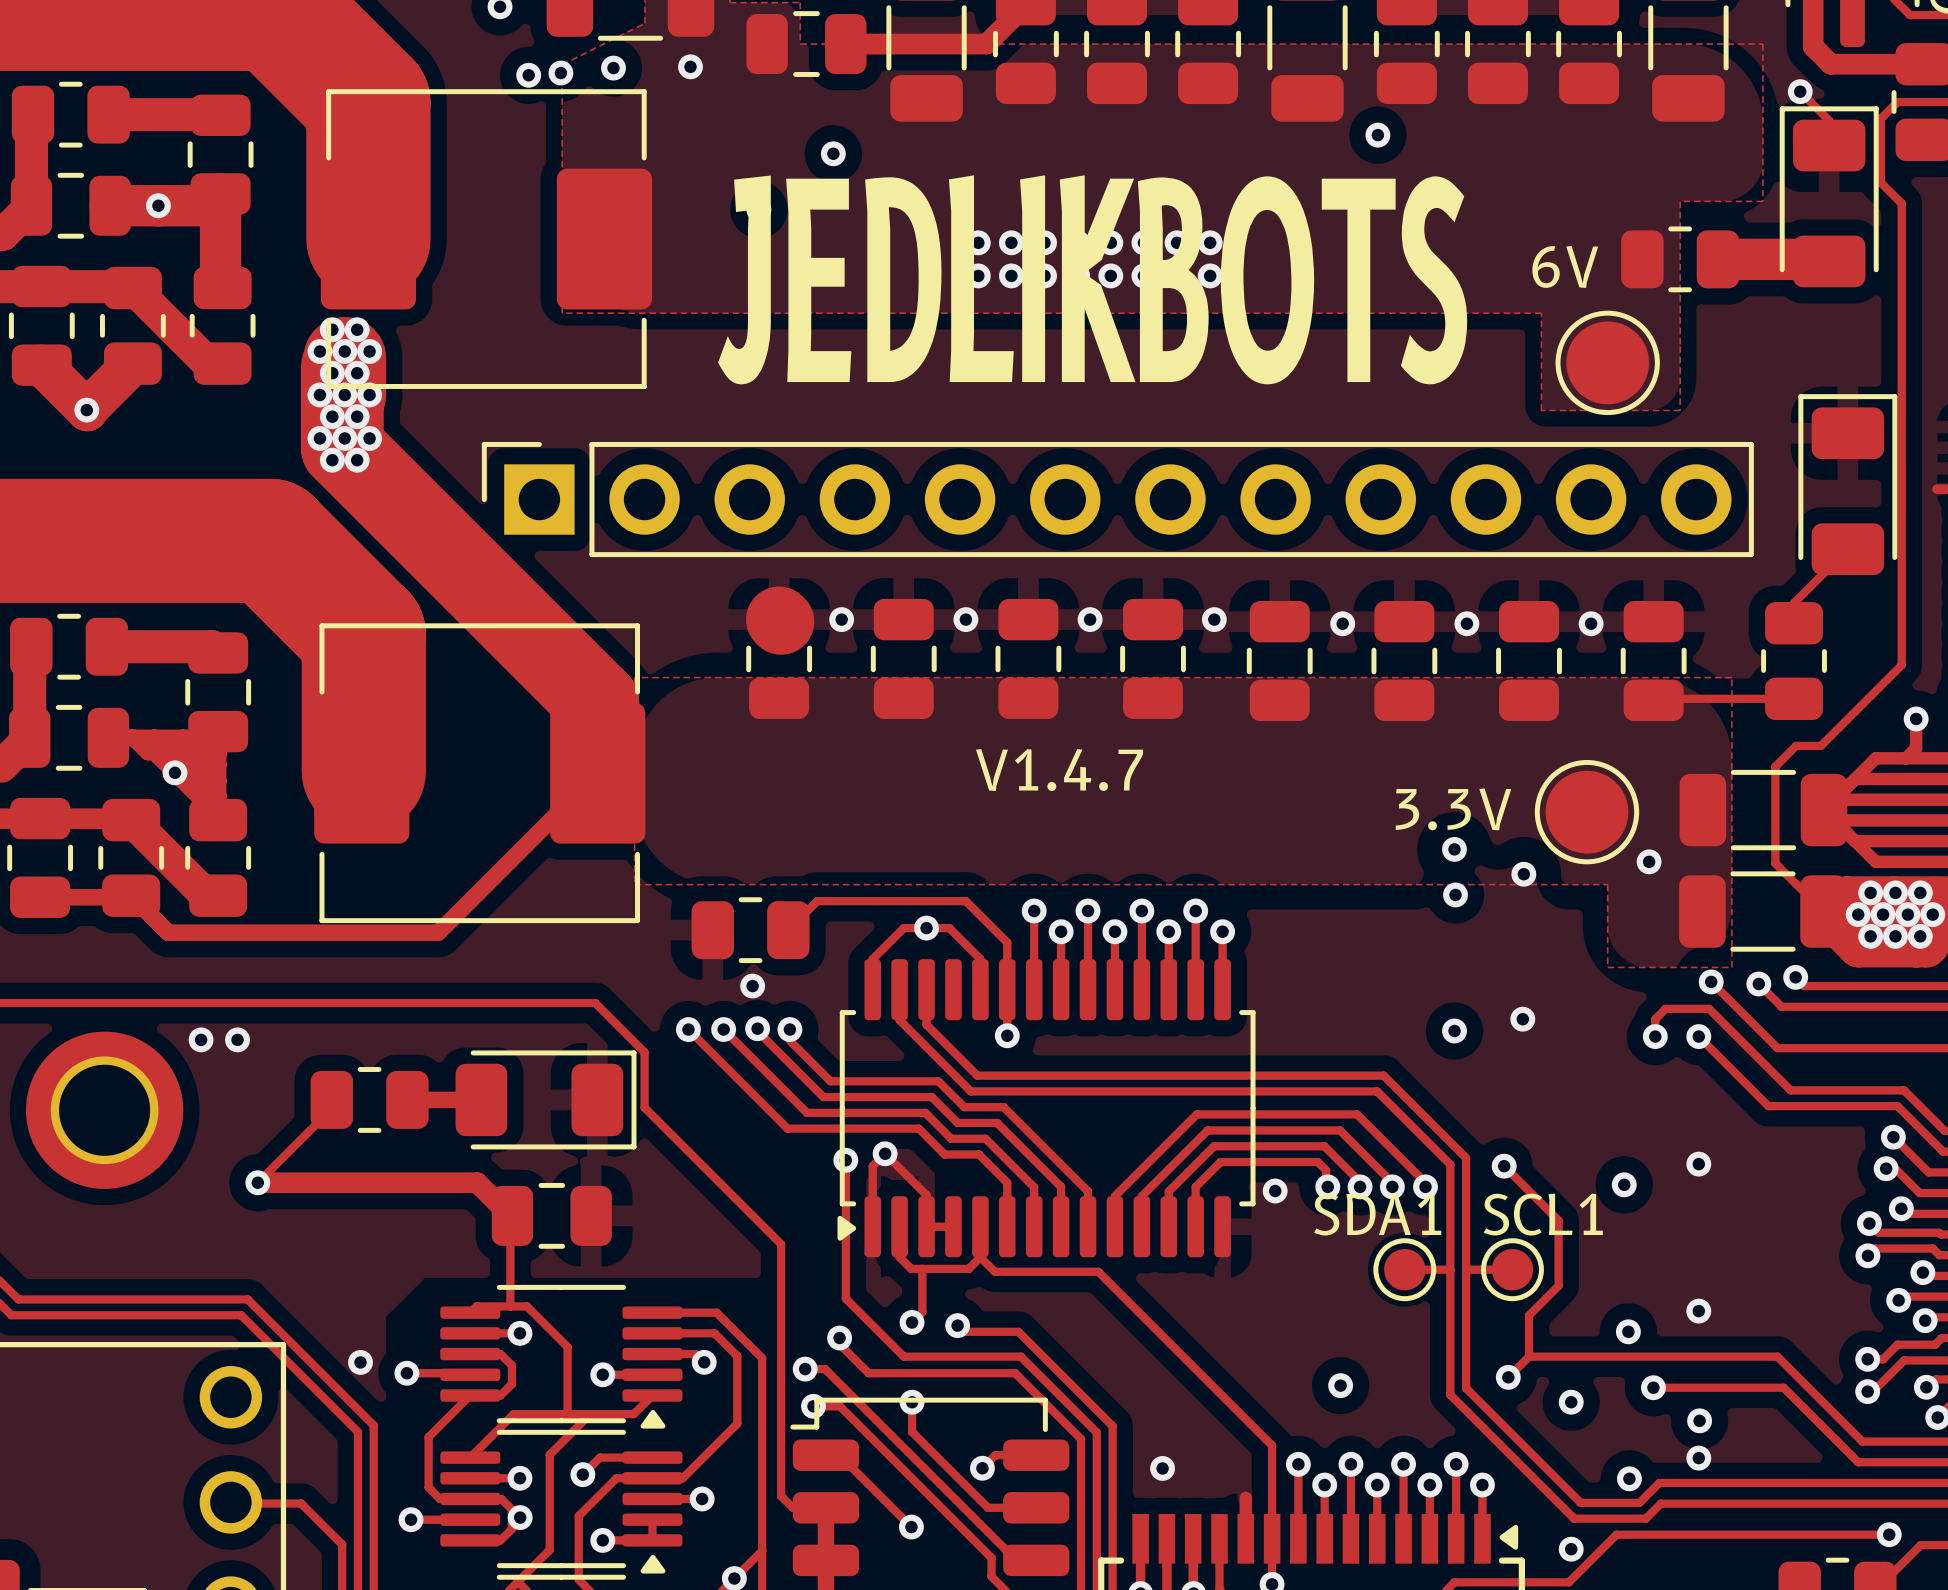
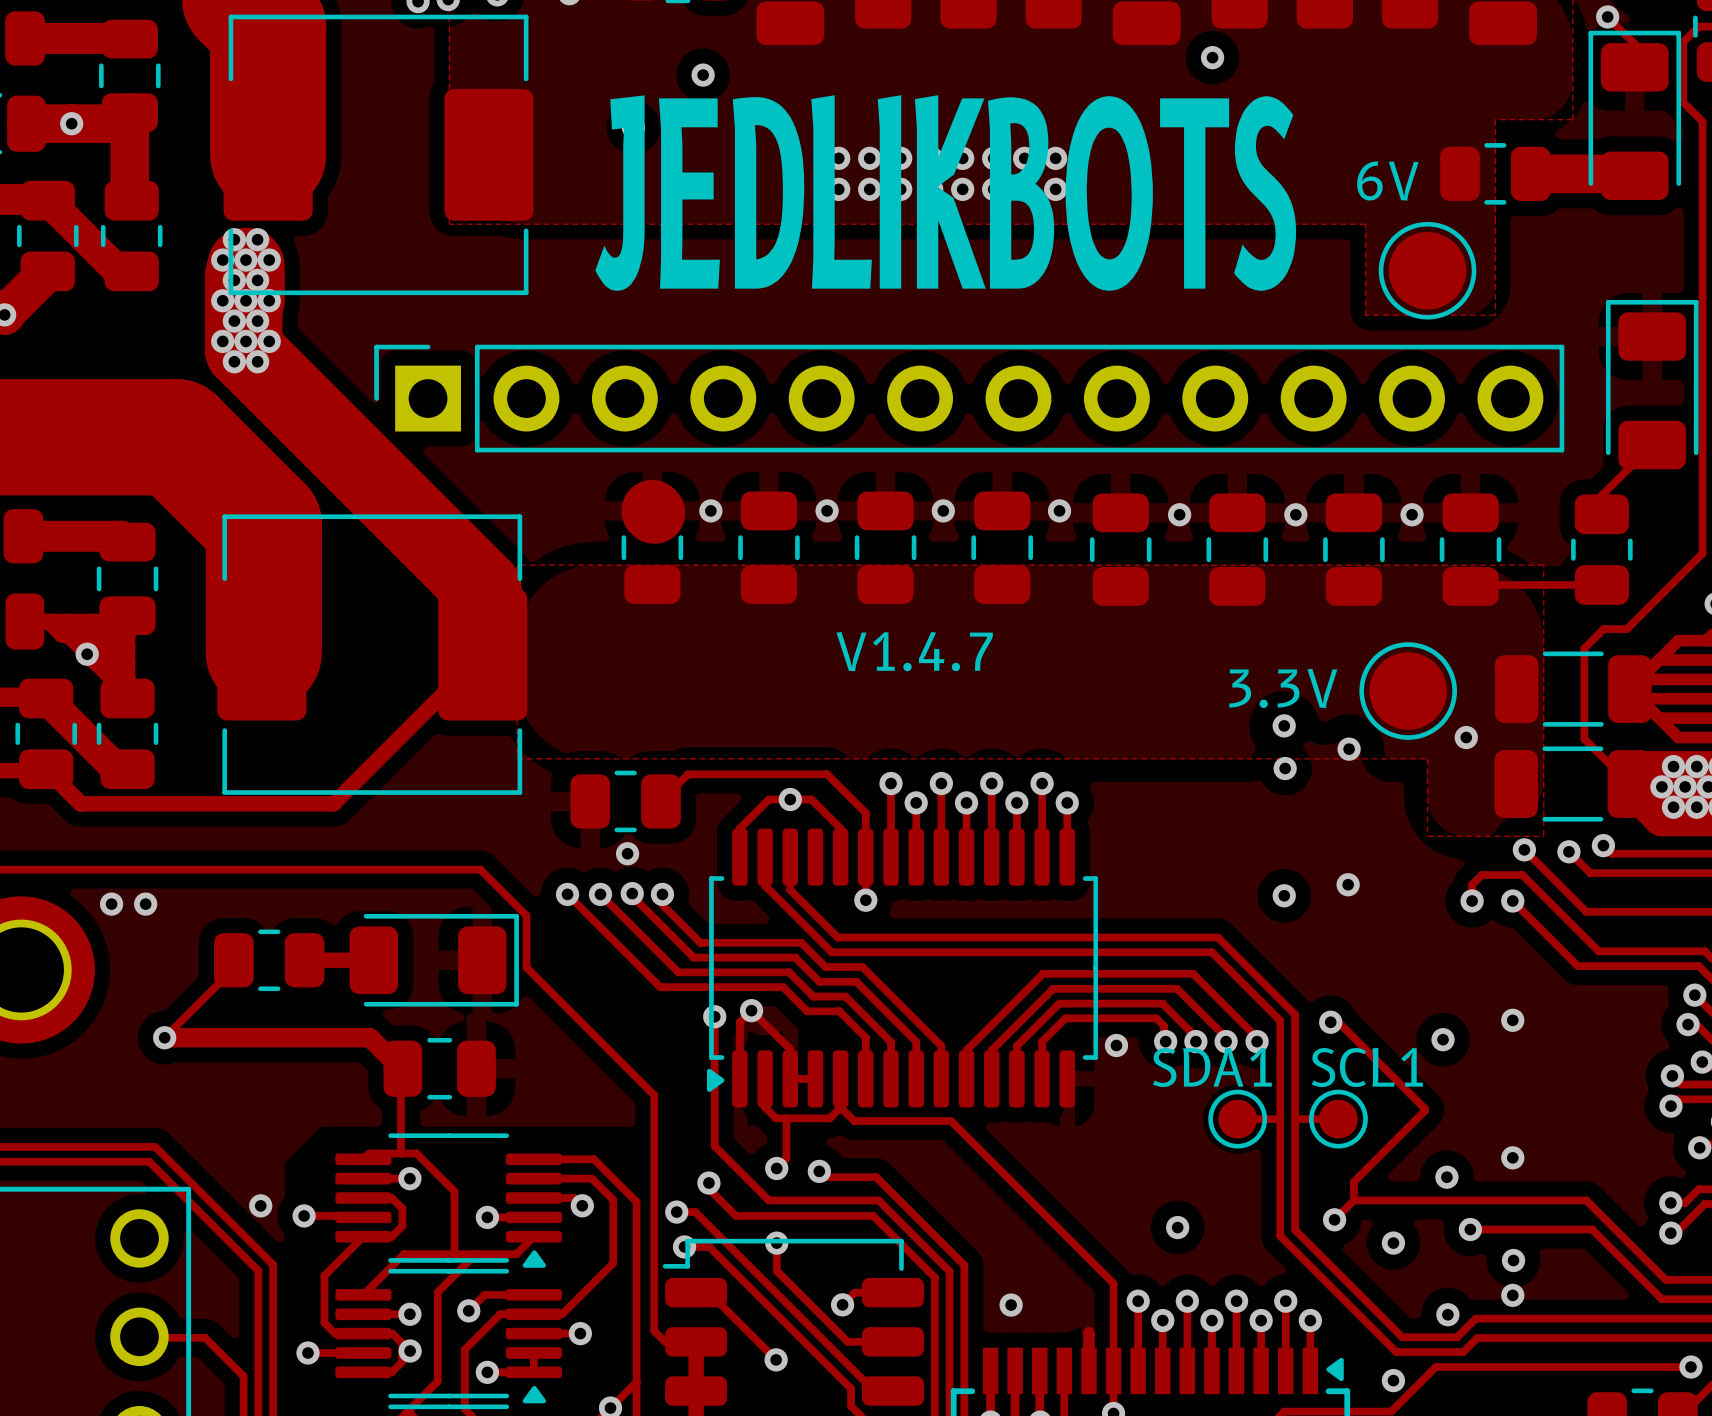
track: (1504, 1166) (1558, 1220) (1558, 1285) (1529, 1315) (1529, 1336) -> (1338, 1022) (1425, 1109) (1353, 1181)

